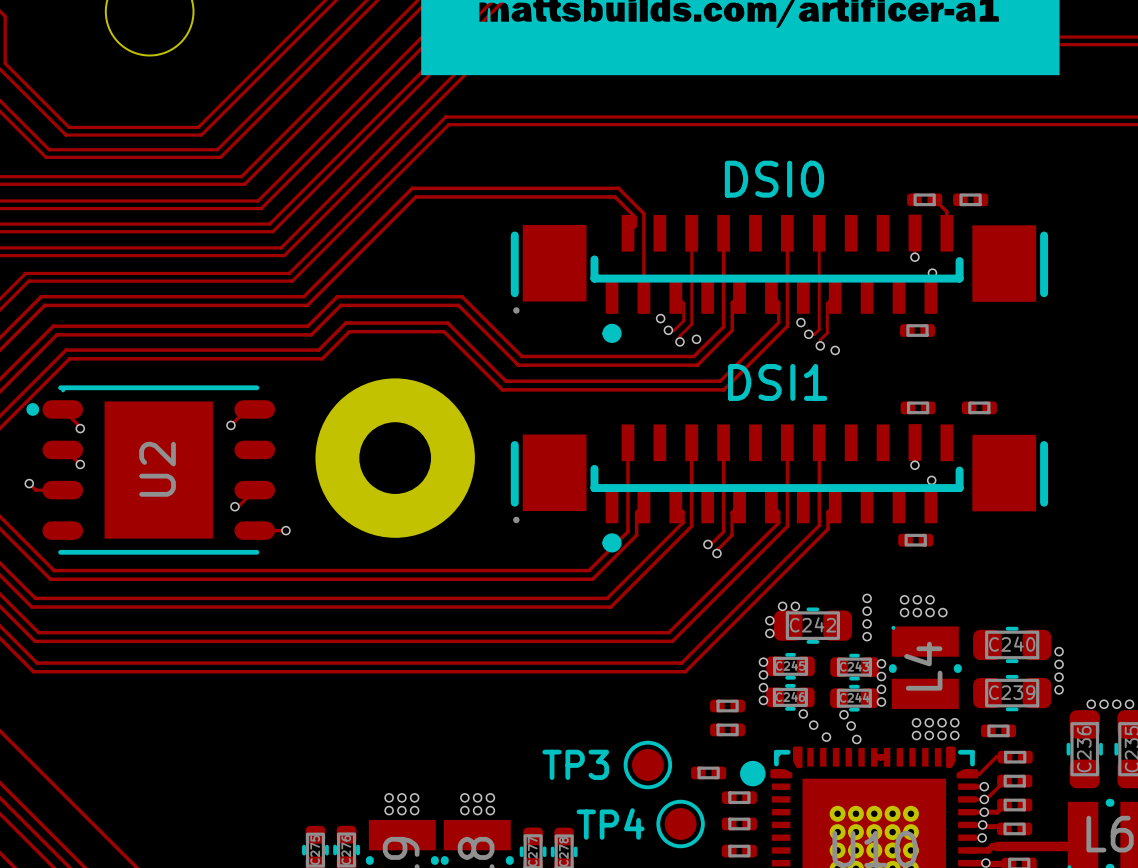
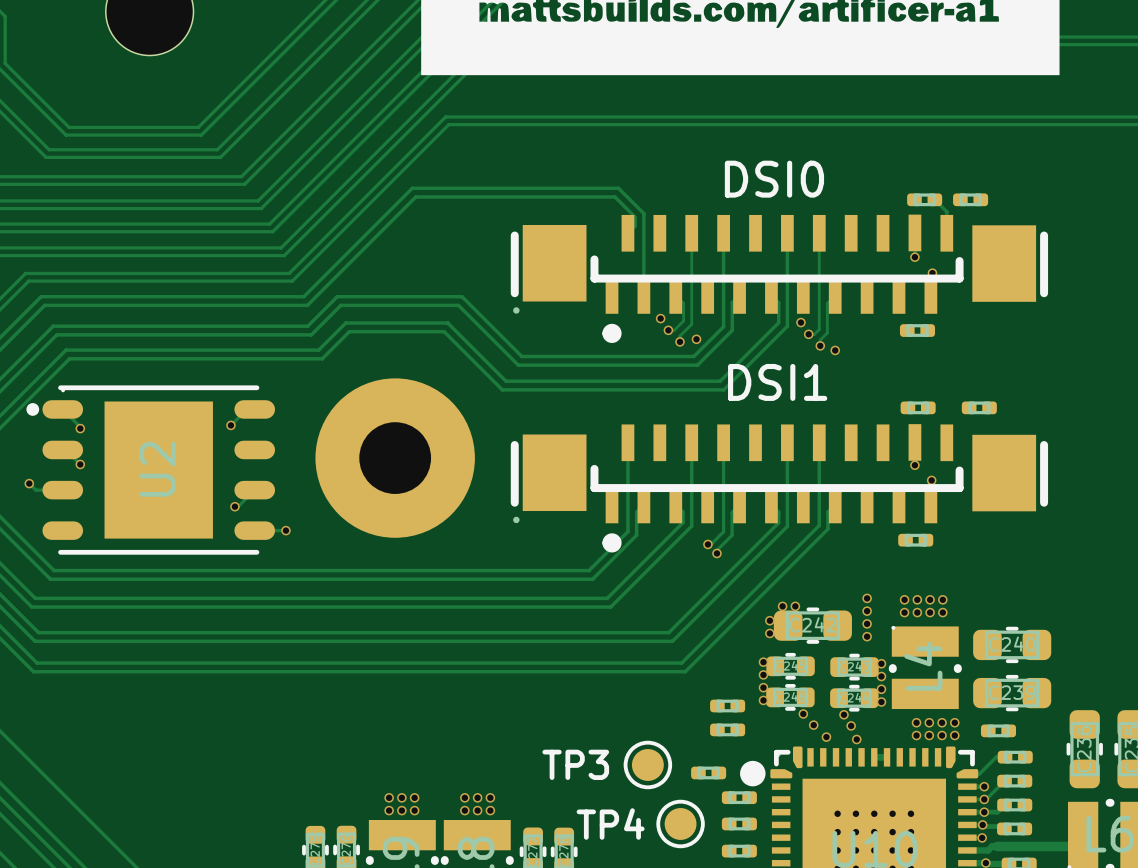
via: none -> (942, 599)
via: (1059, 651) -> none
via: (1059, 664) -> none
via: (1059, 677) -> none
via: (1059, 689) -> none
via: (1091, 704) -> none
via: (1104, 704) -> none
via: (1116, 704) -> none
via: (1129, 704) -> none

